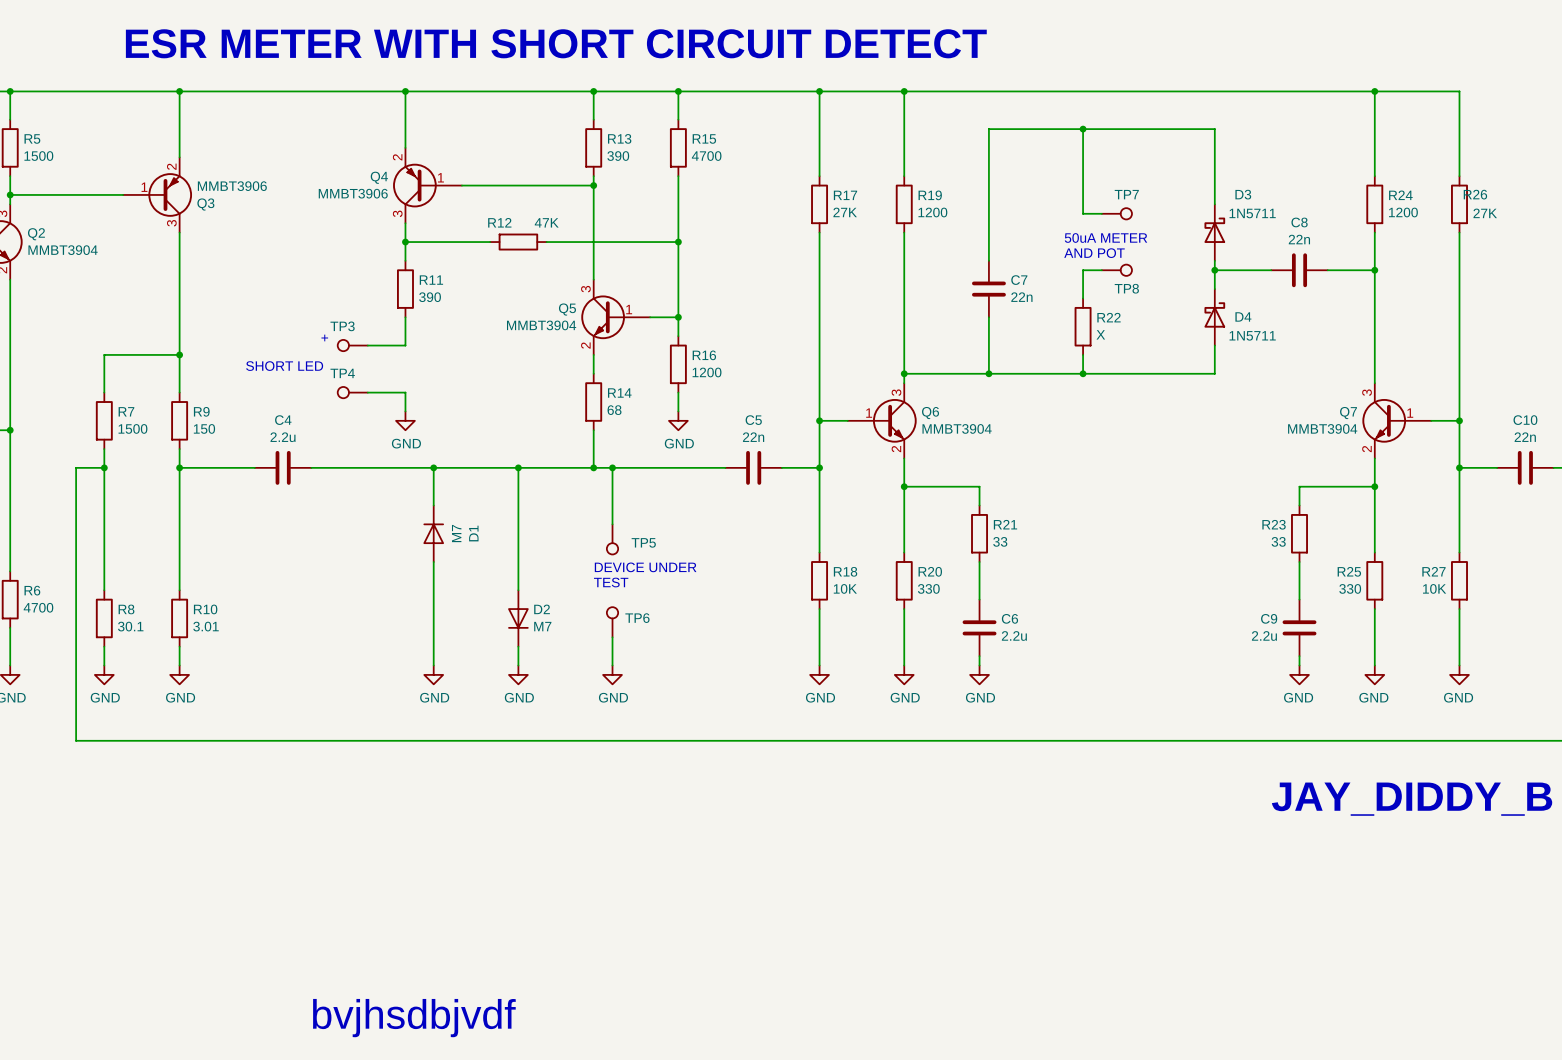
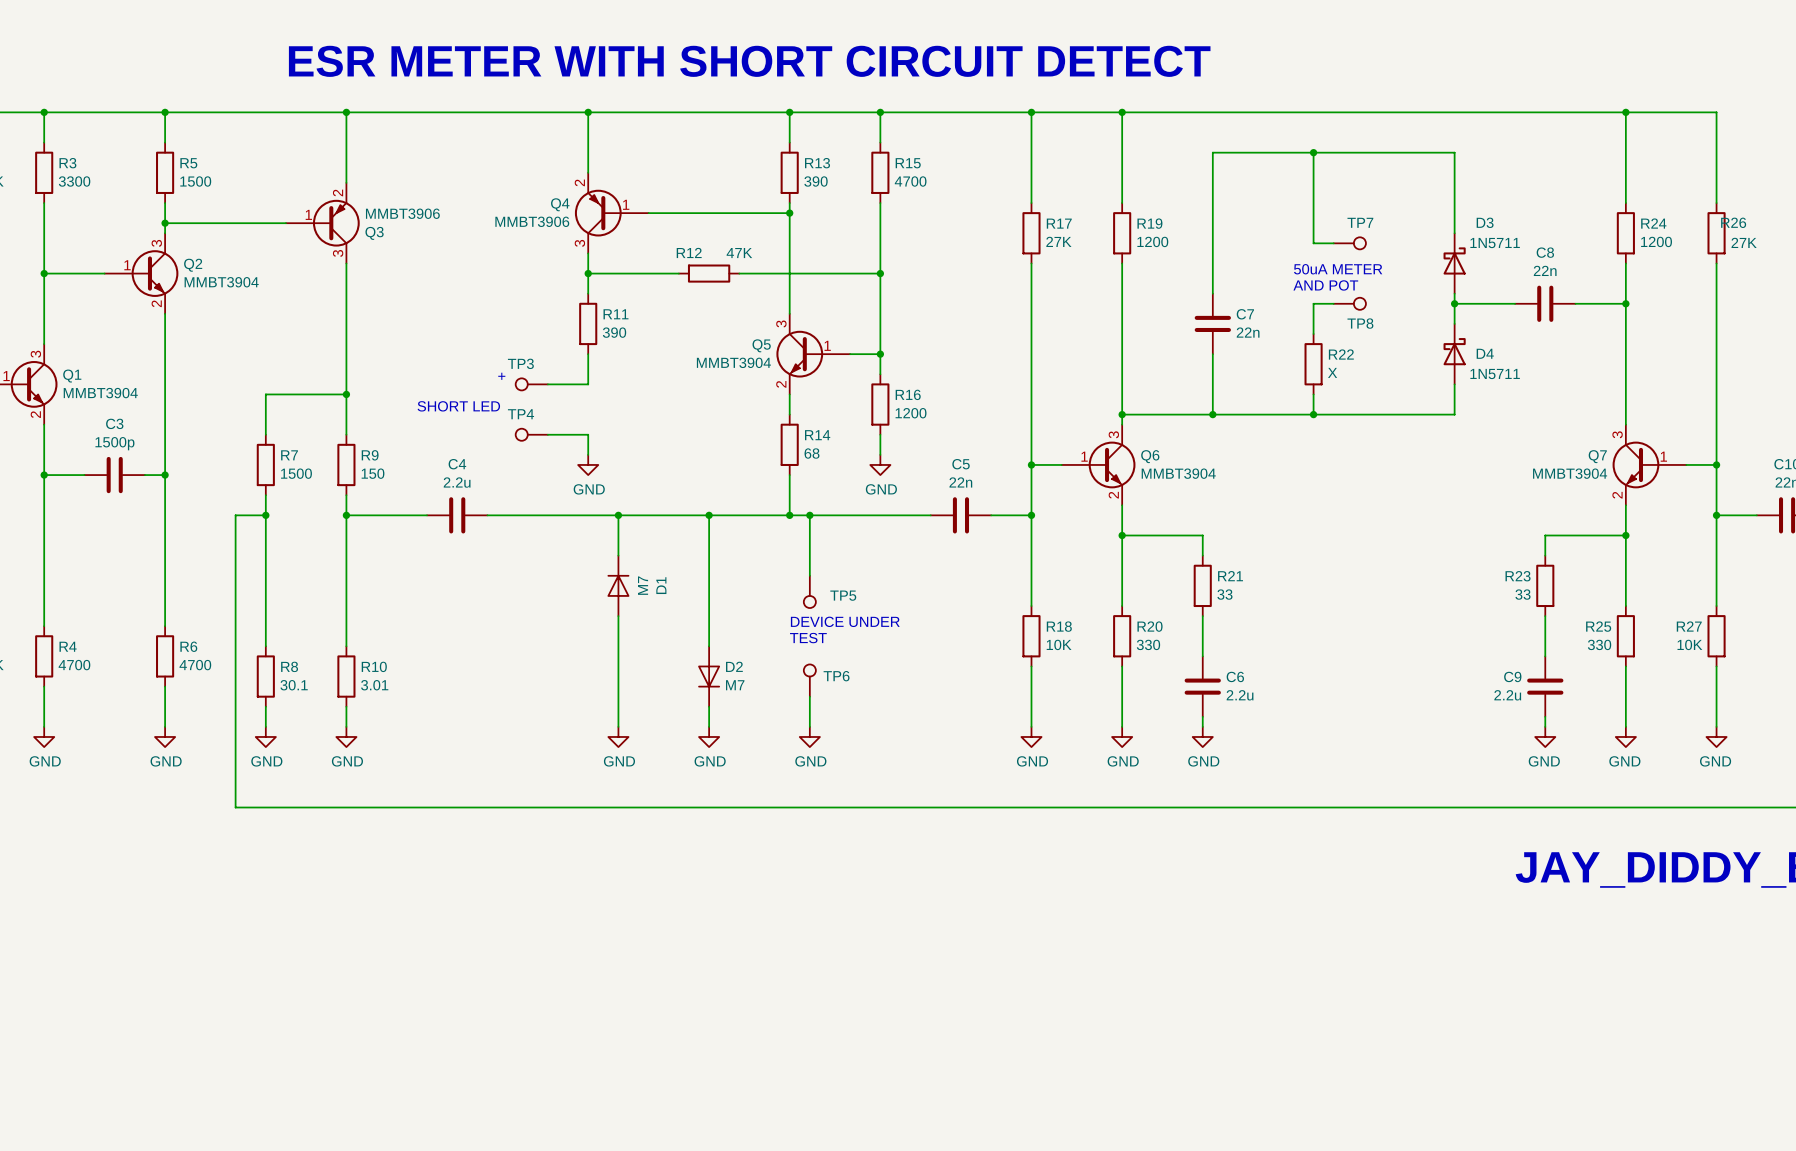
text: bvjhsdbjvdf (414, 1018) -> none

